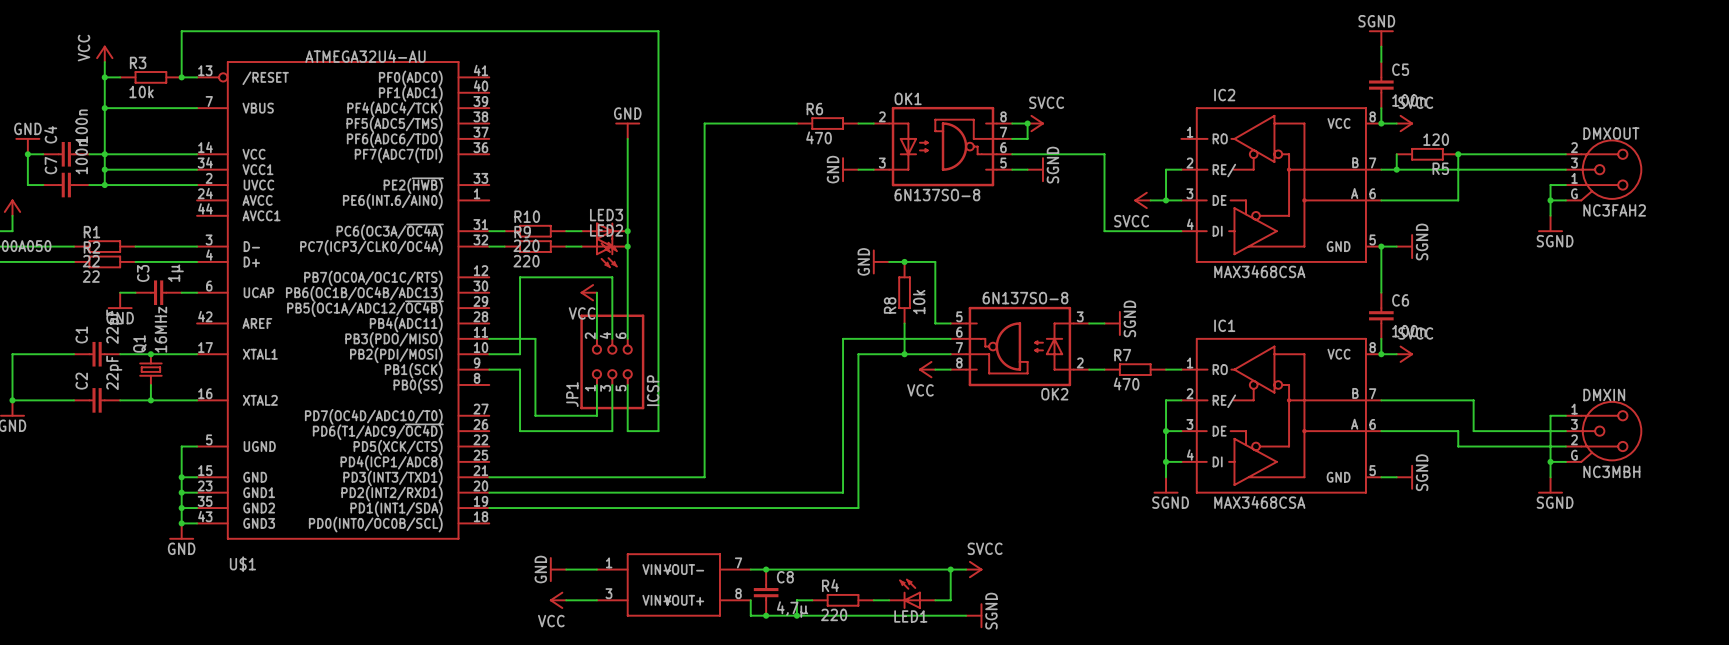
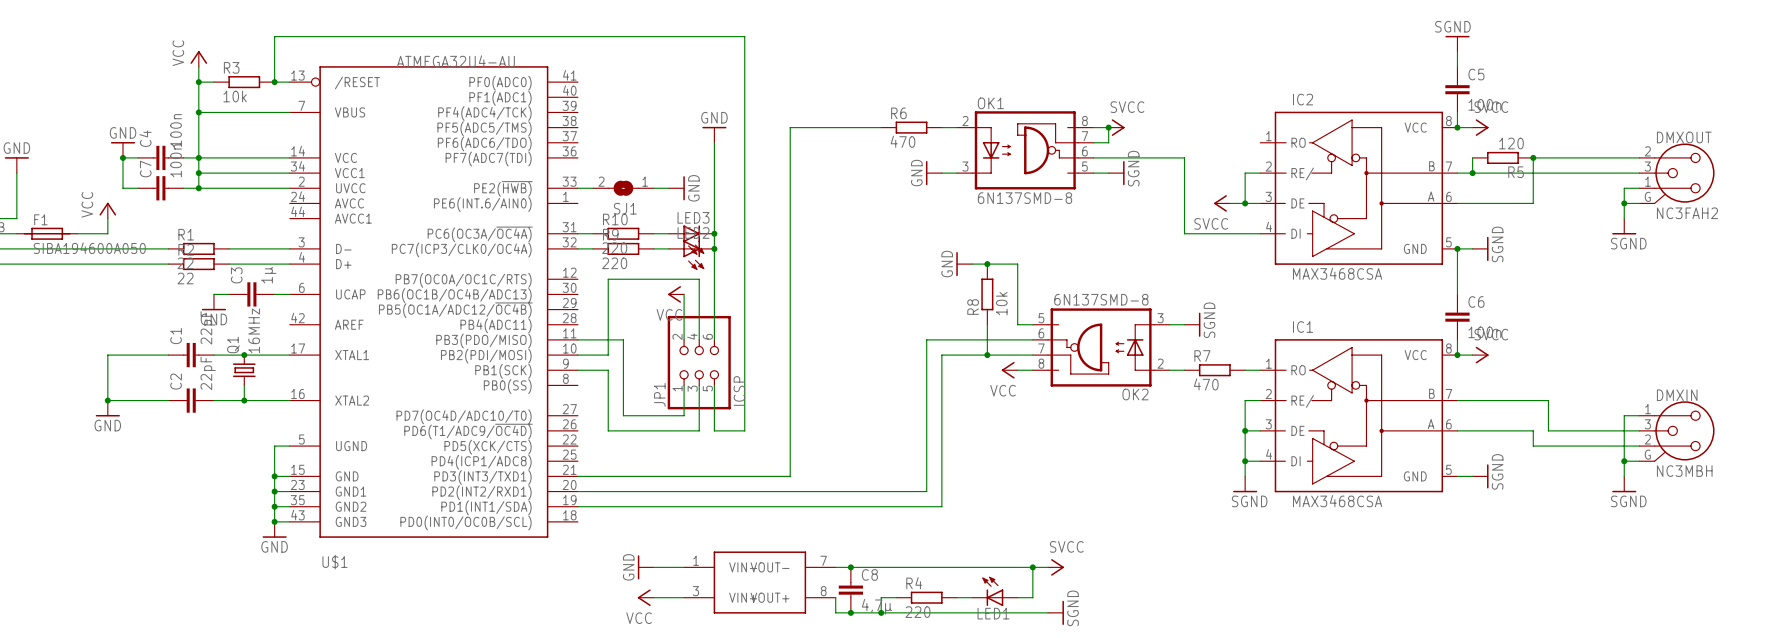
wire: none -> (577, 188) (593, 188)
SJ1: none -> (623, 188)
wire: none -> (653, 188) (668, 188)
power symbol: none -> GND (676, 188)
OK1 value: 6N137SO-8 (937, 195) -> 6N137SMD-8 (1024, 198)
OK2 value: 6N137SO-8 (1025, 298) -> 6N137SMD-8 (1101, 299)

